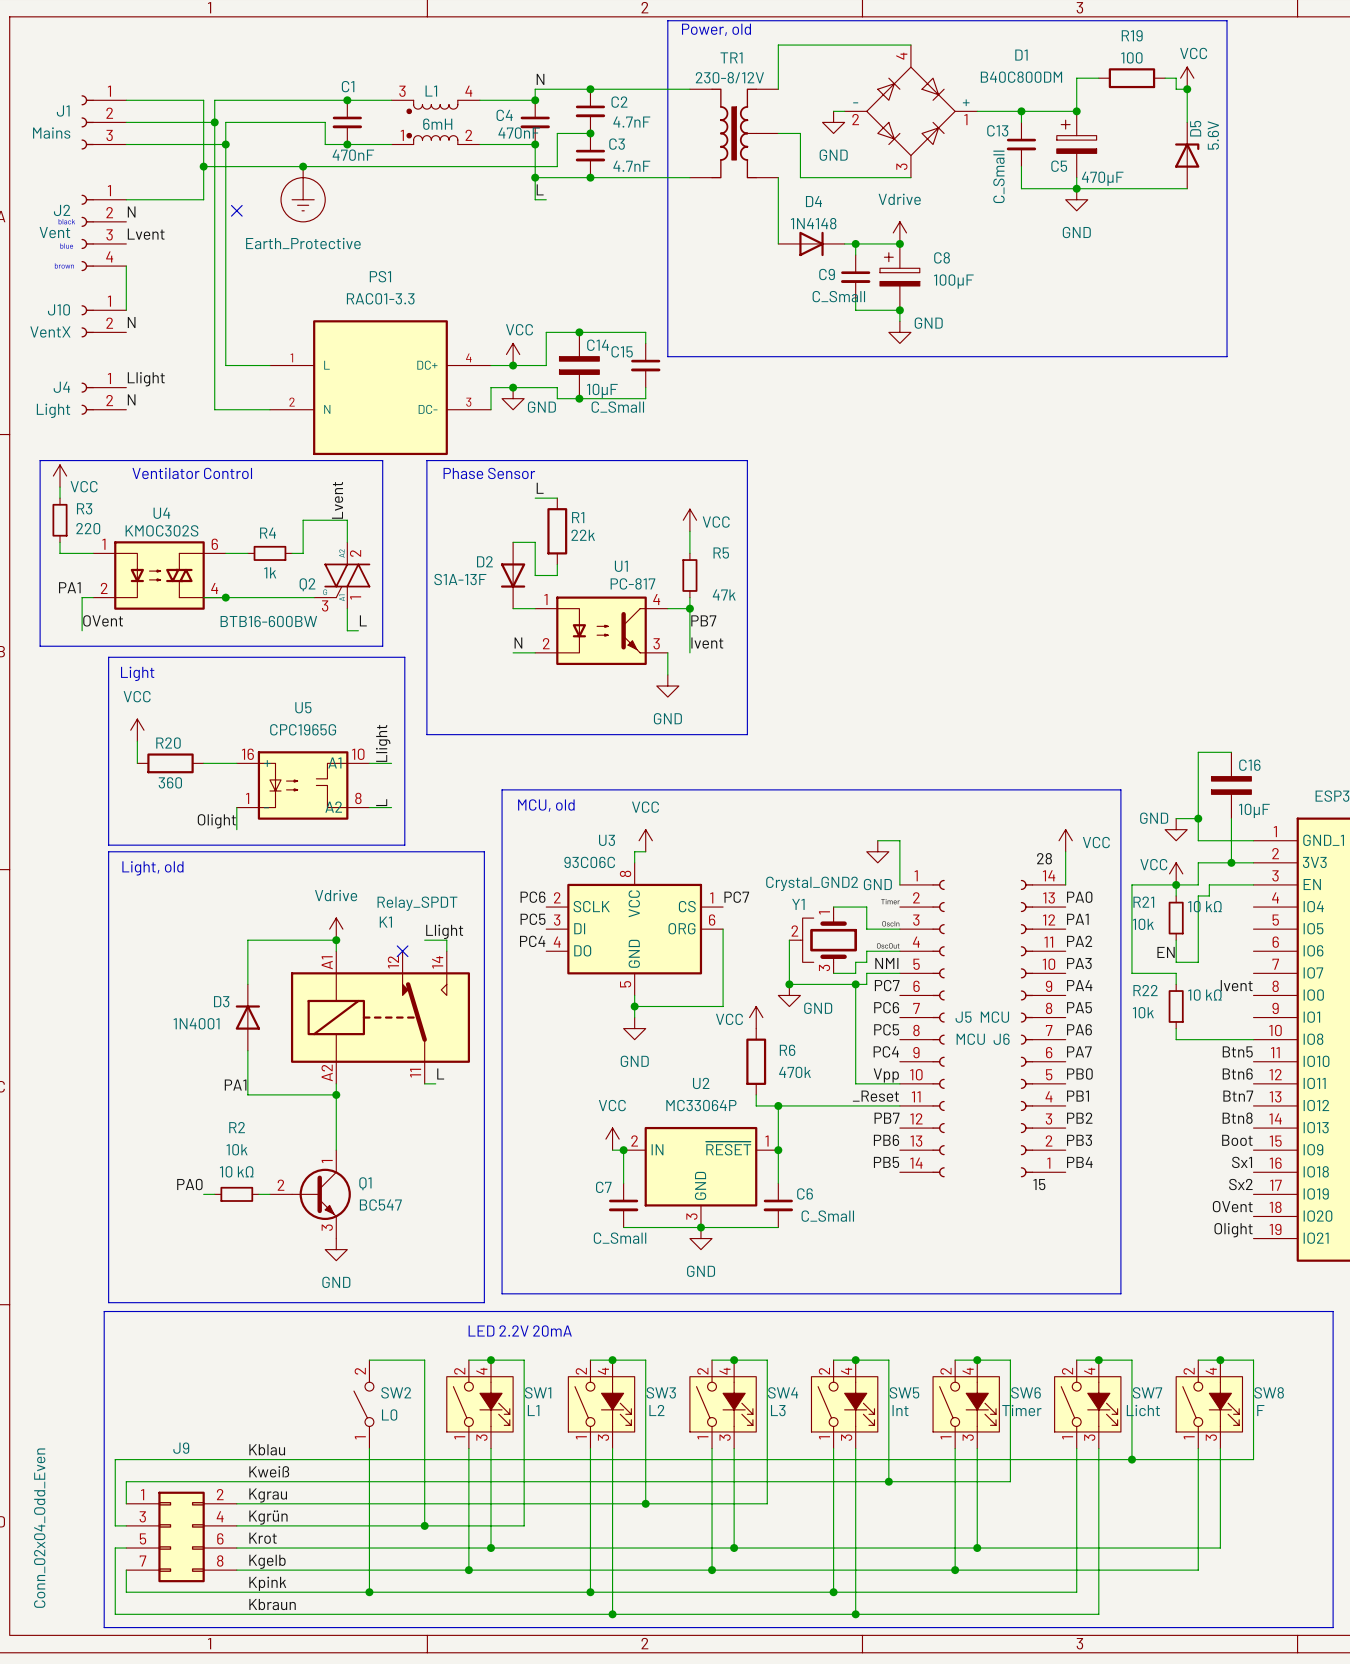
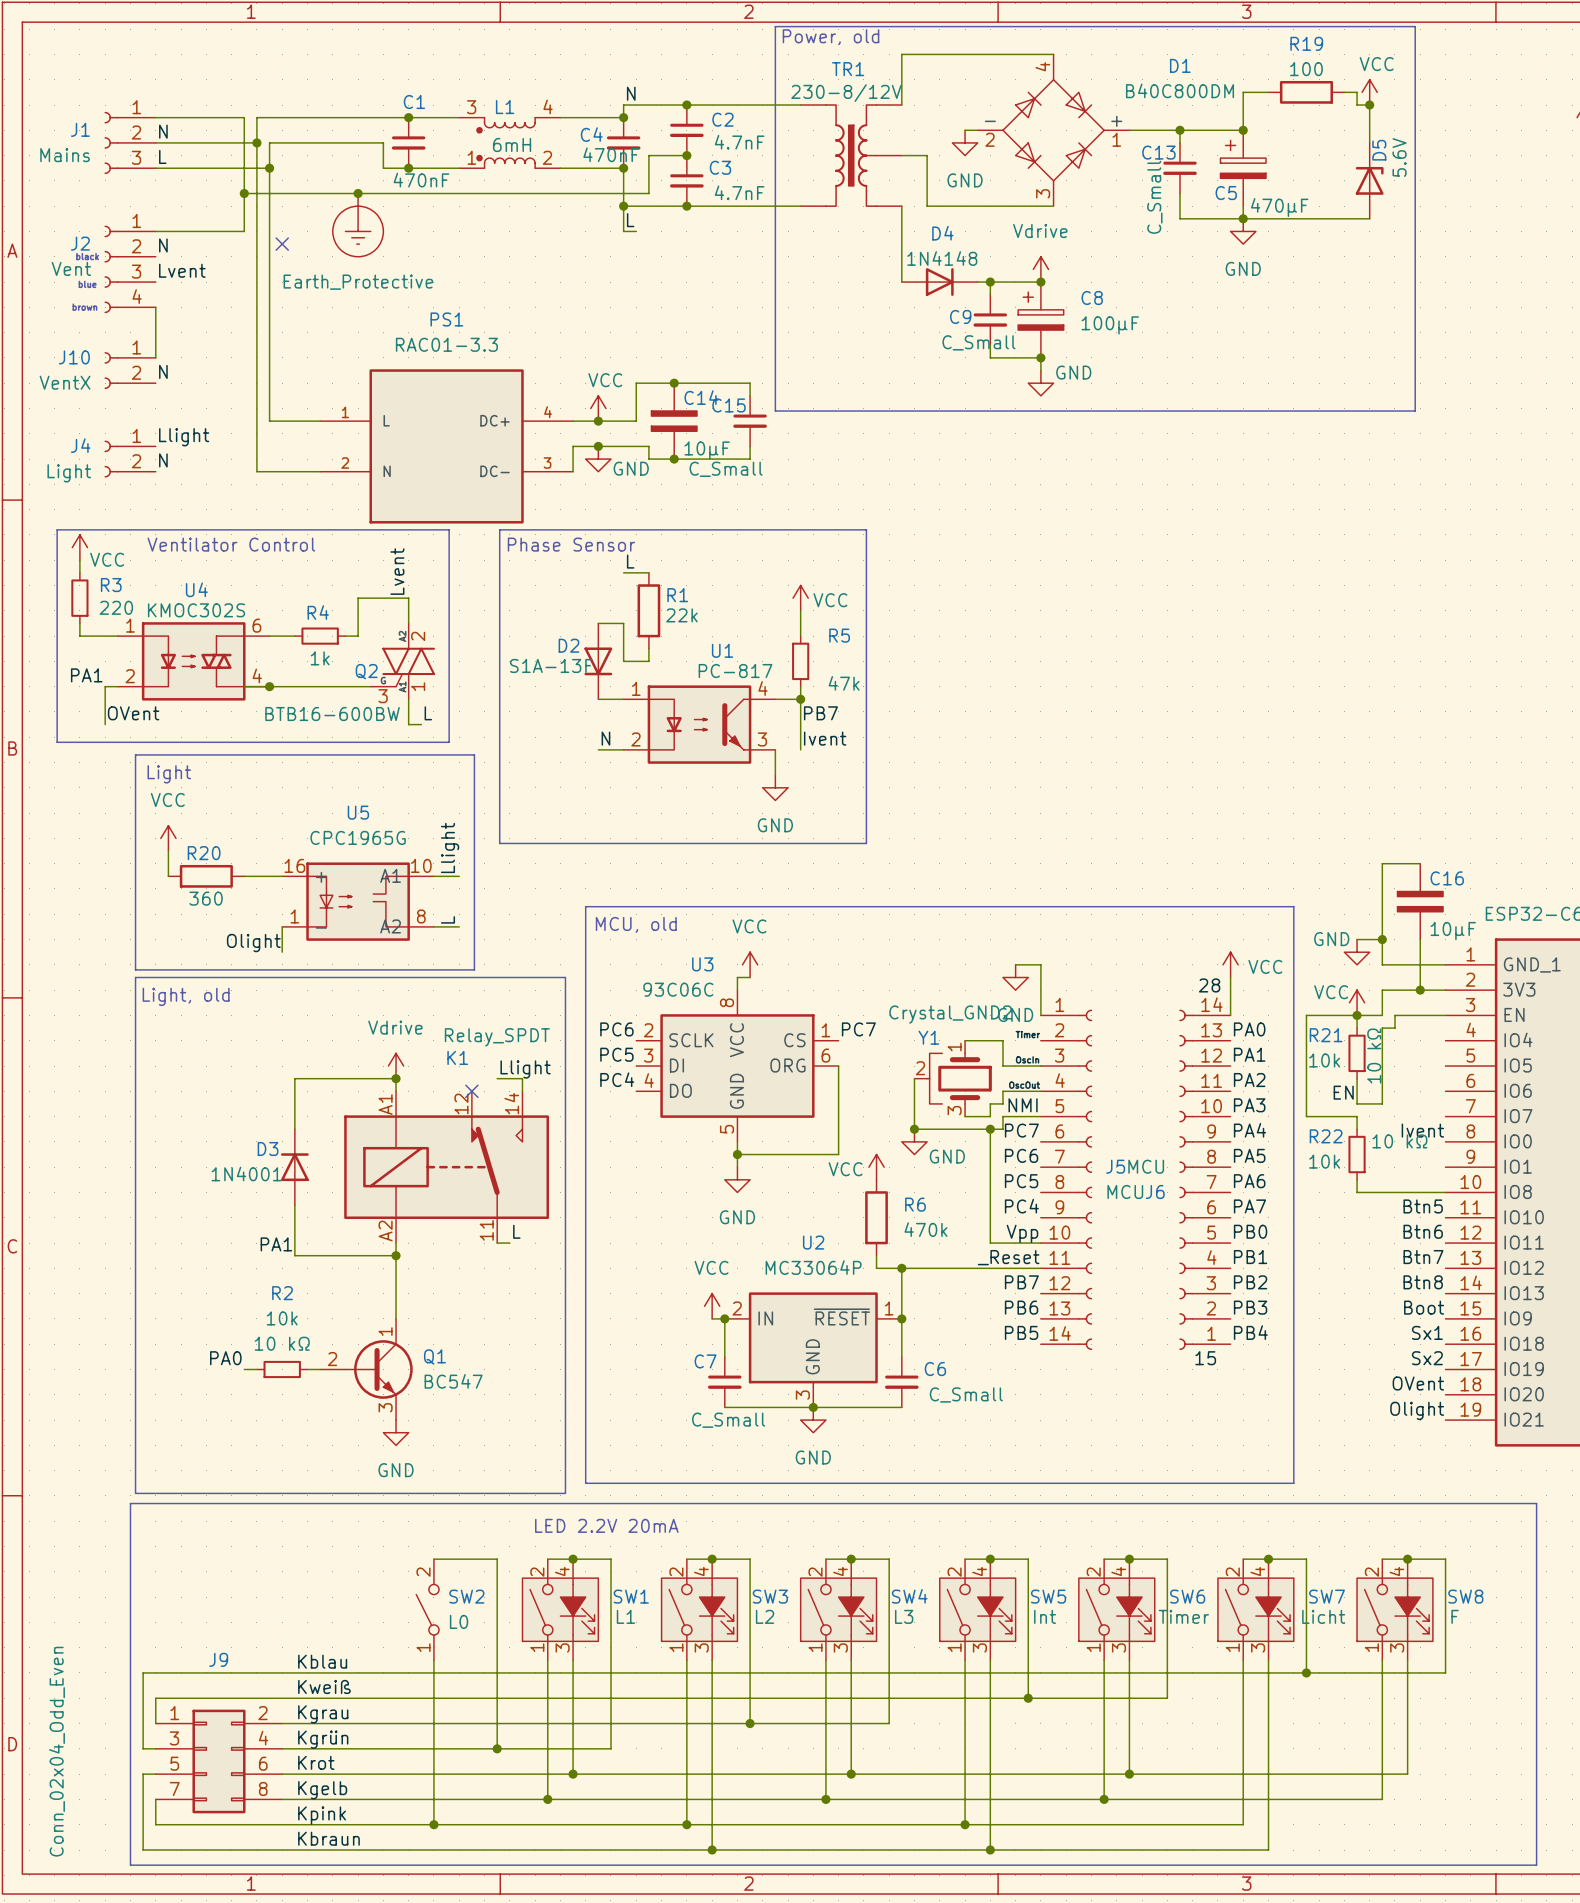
label: none -> N (163, 131)
label: none -> L (162, 156)
R21 text rotation: 0° (1204, 906) -> 90° counterclockwise (1374, 1056)

